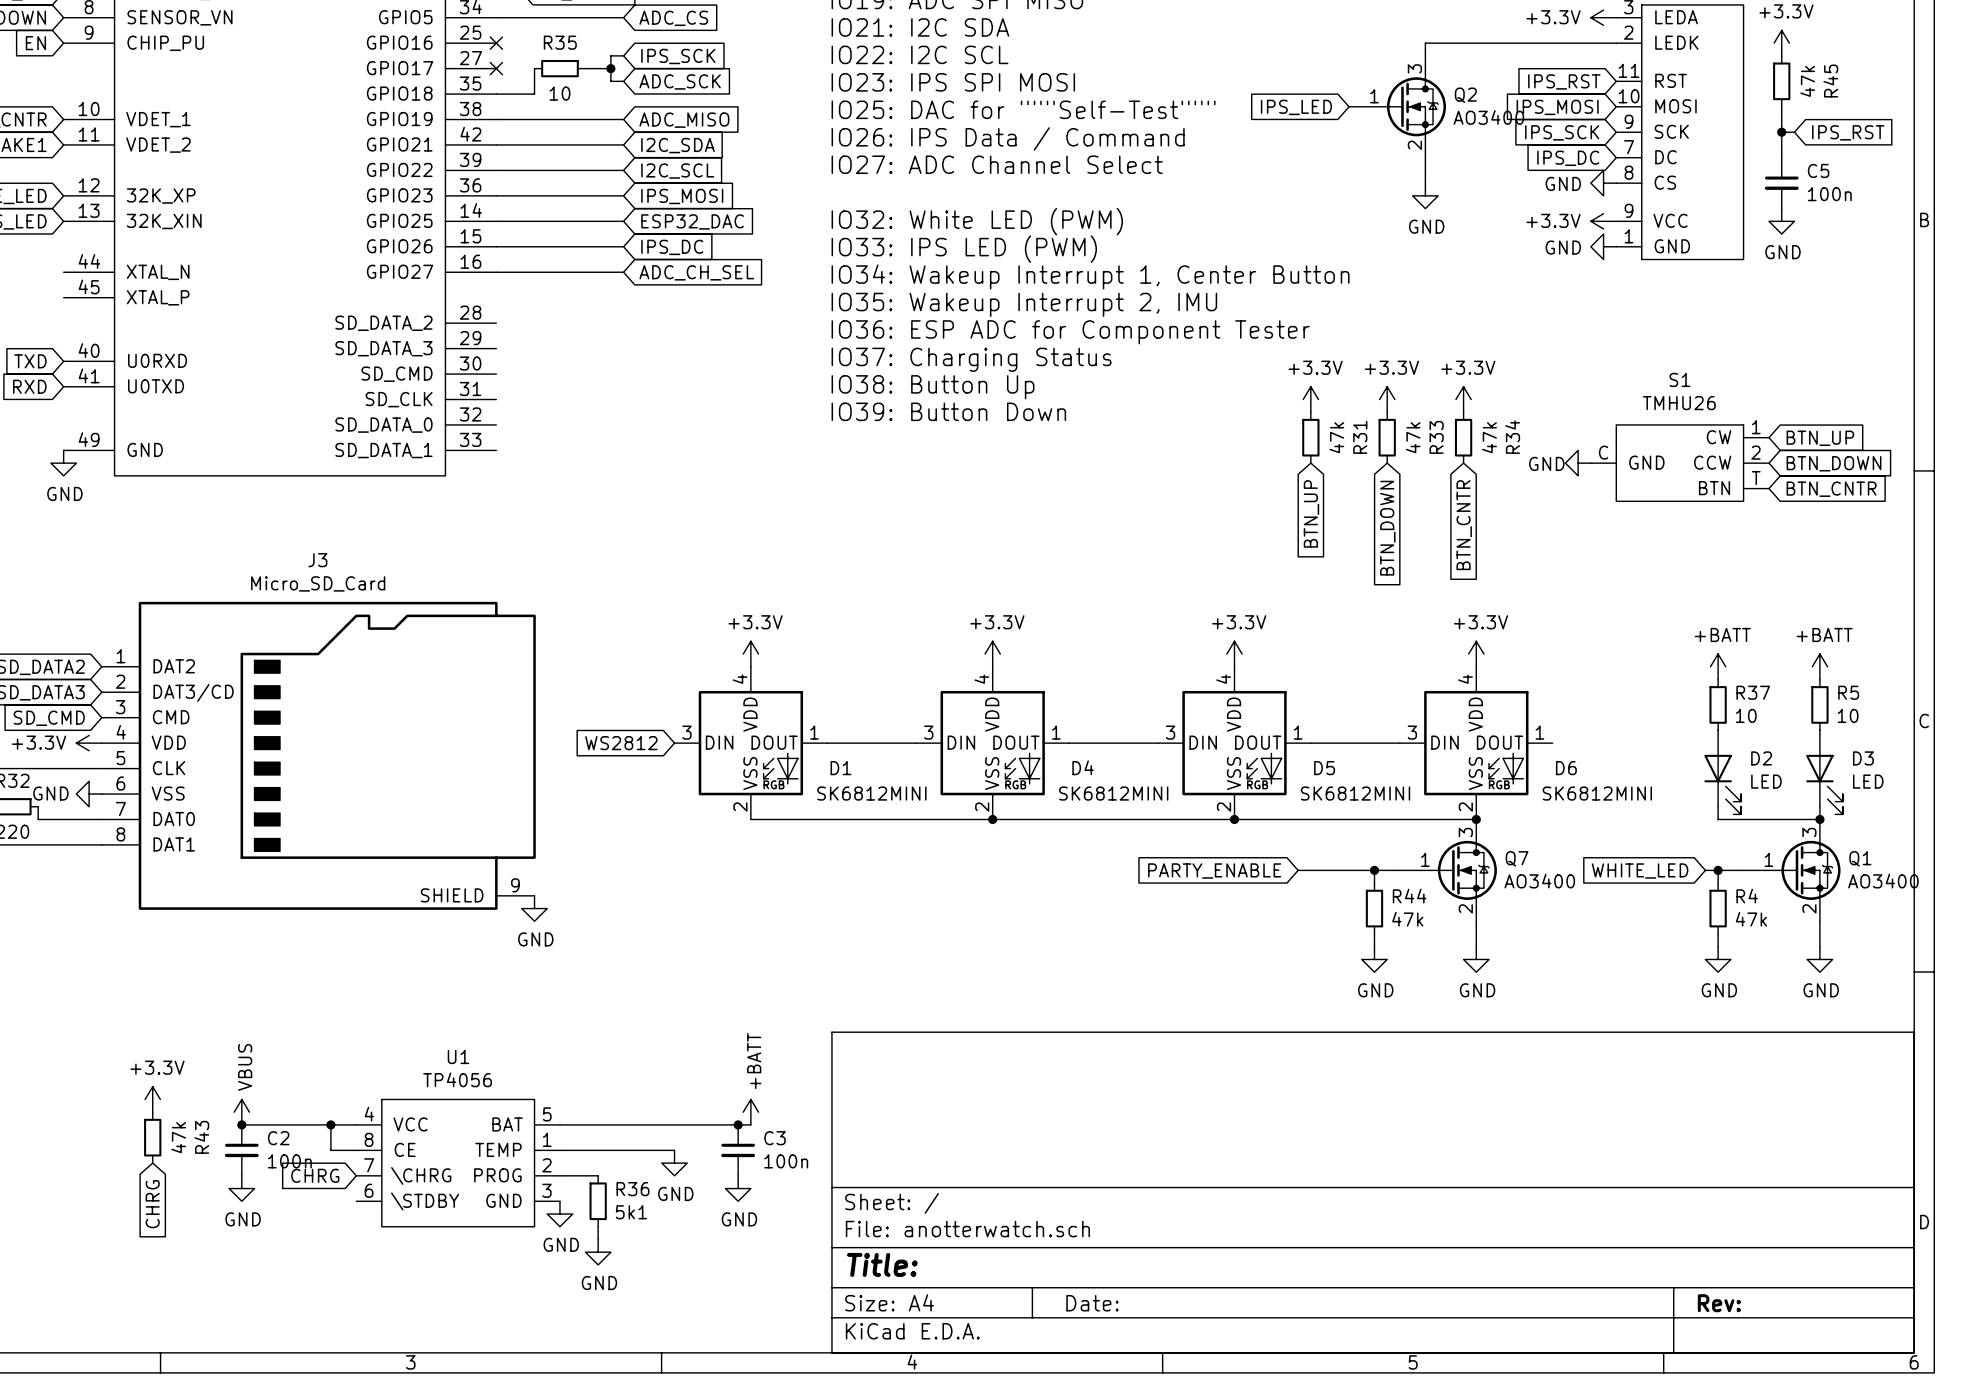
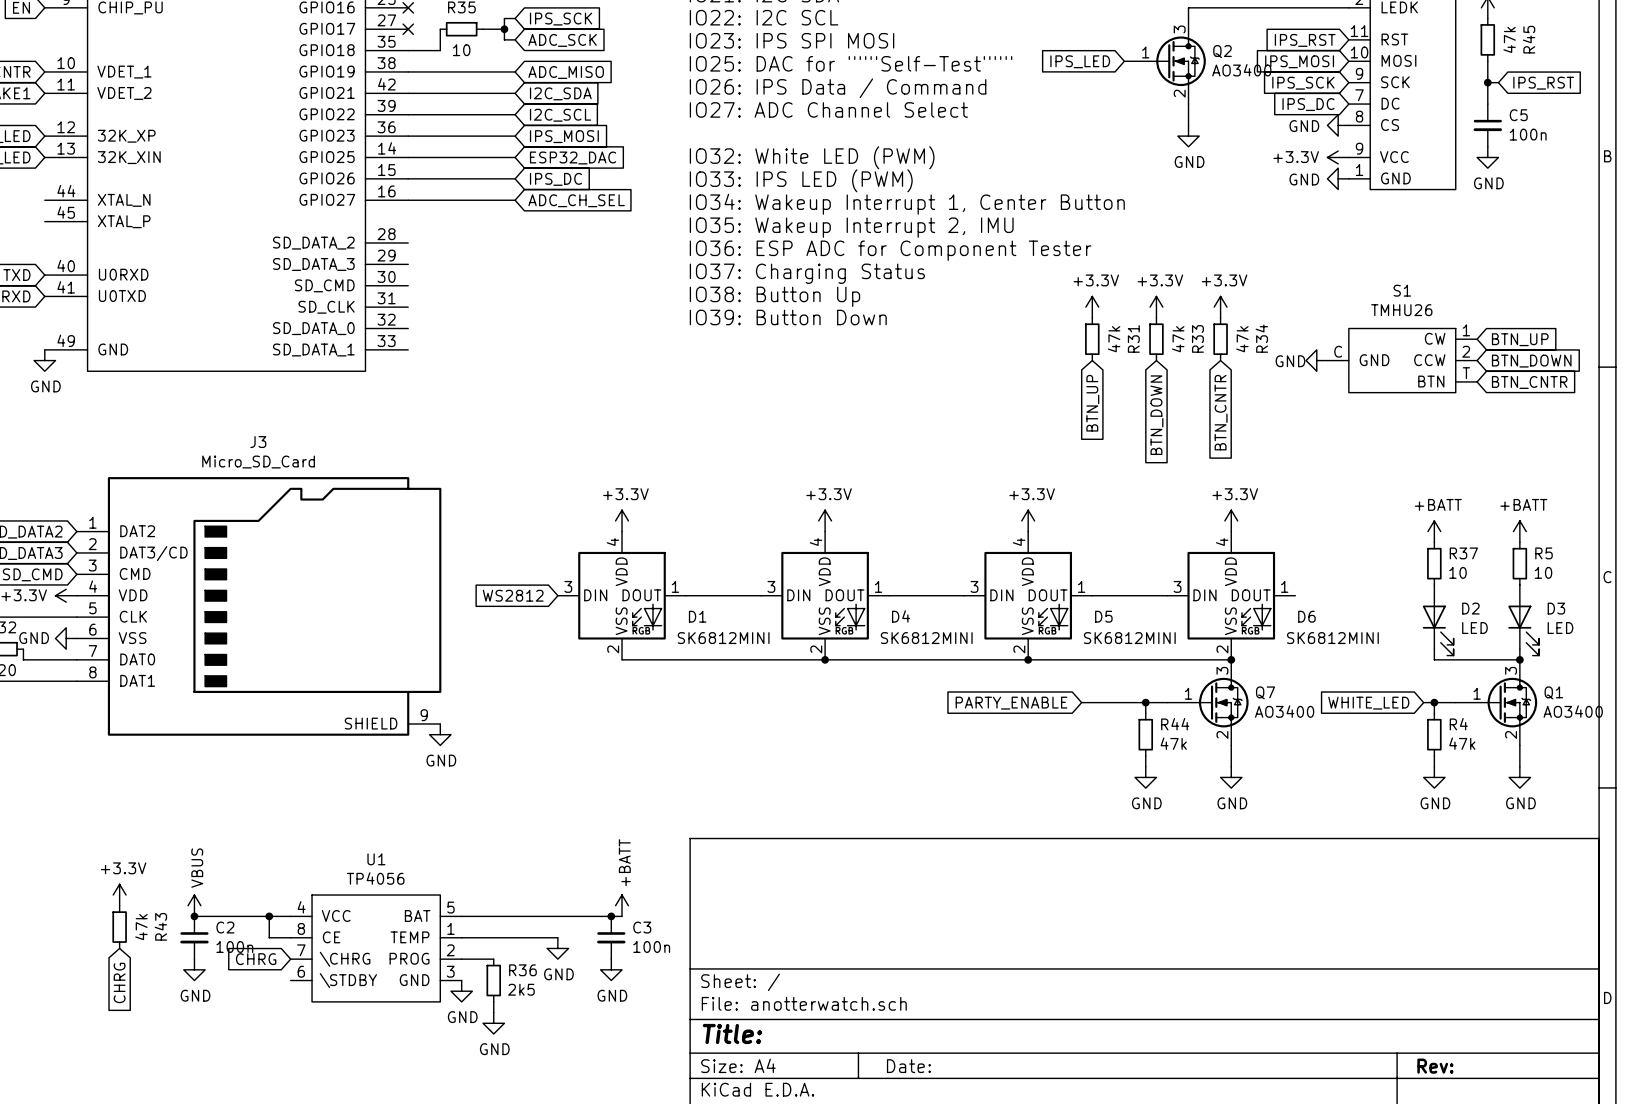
R36 value: 5k1 (631, 1212) -> 2k5 (521, 989)

